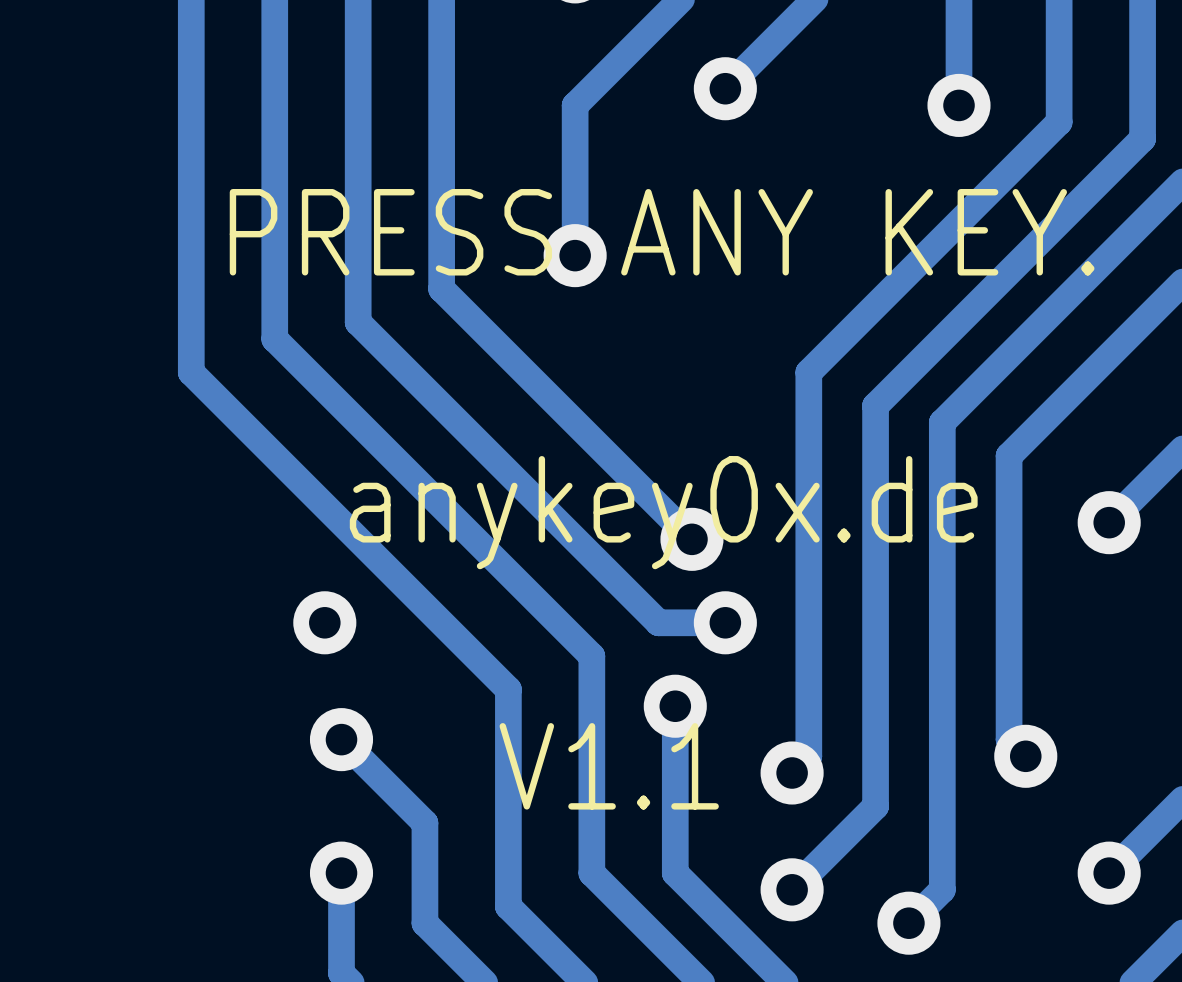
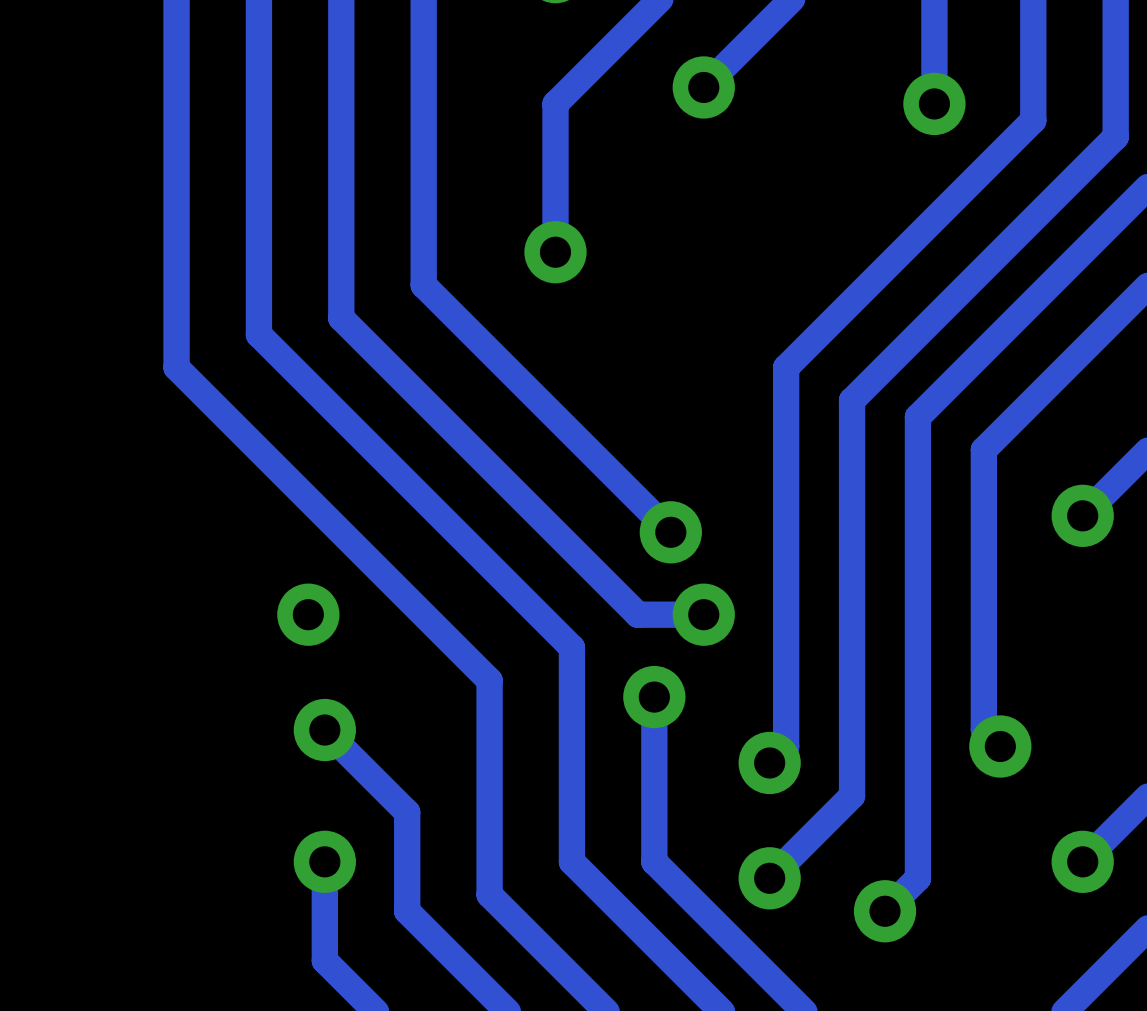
text: PRESS ANY KEY. (662, 232) -> none
text: anykey0x.de (663, 512) -> none
text: V1.1 (609, 766) -> none

